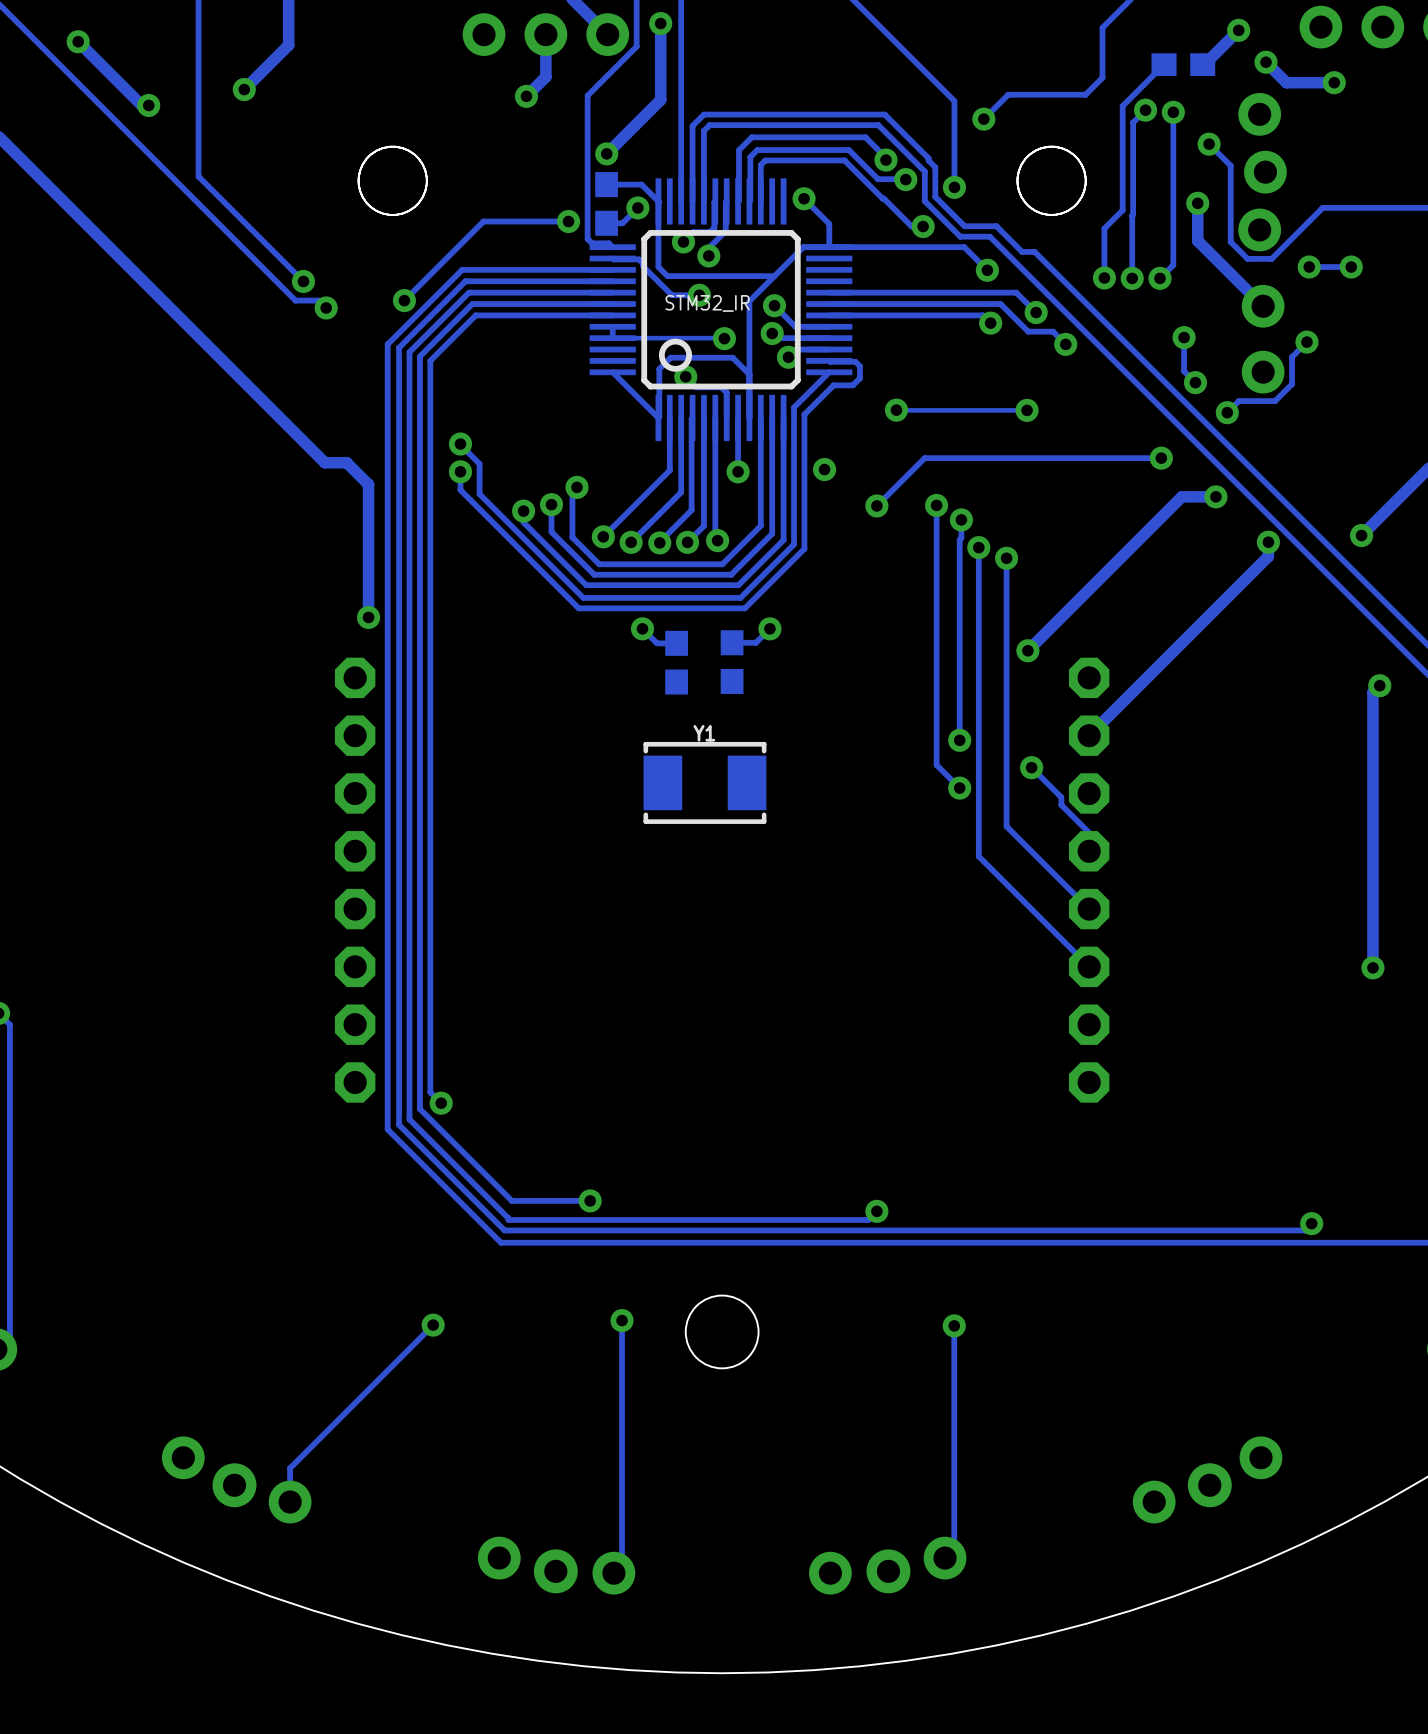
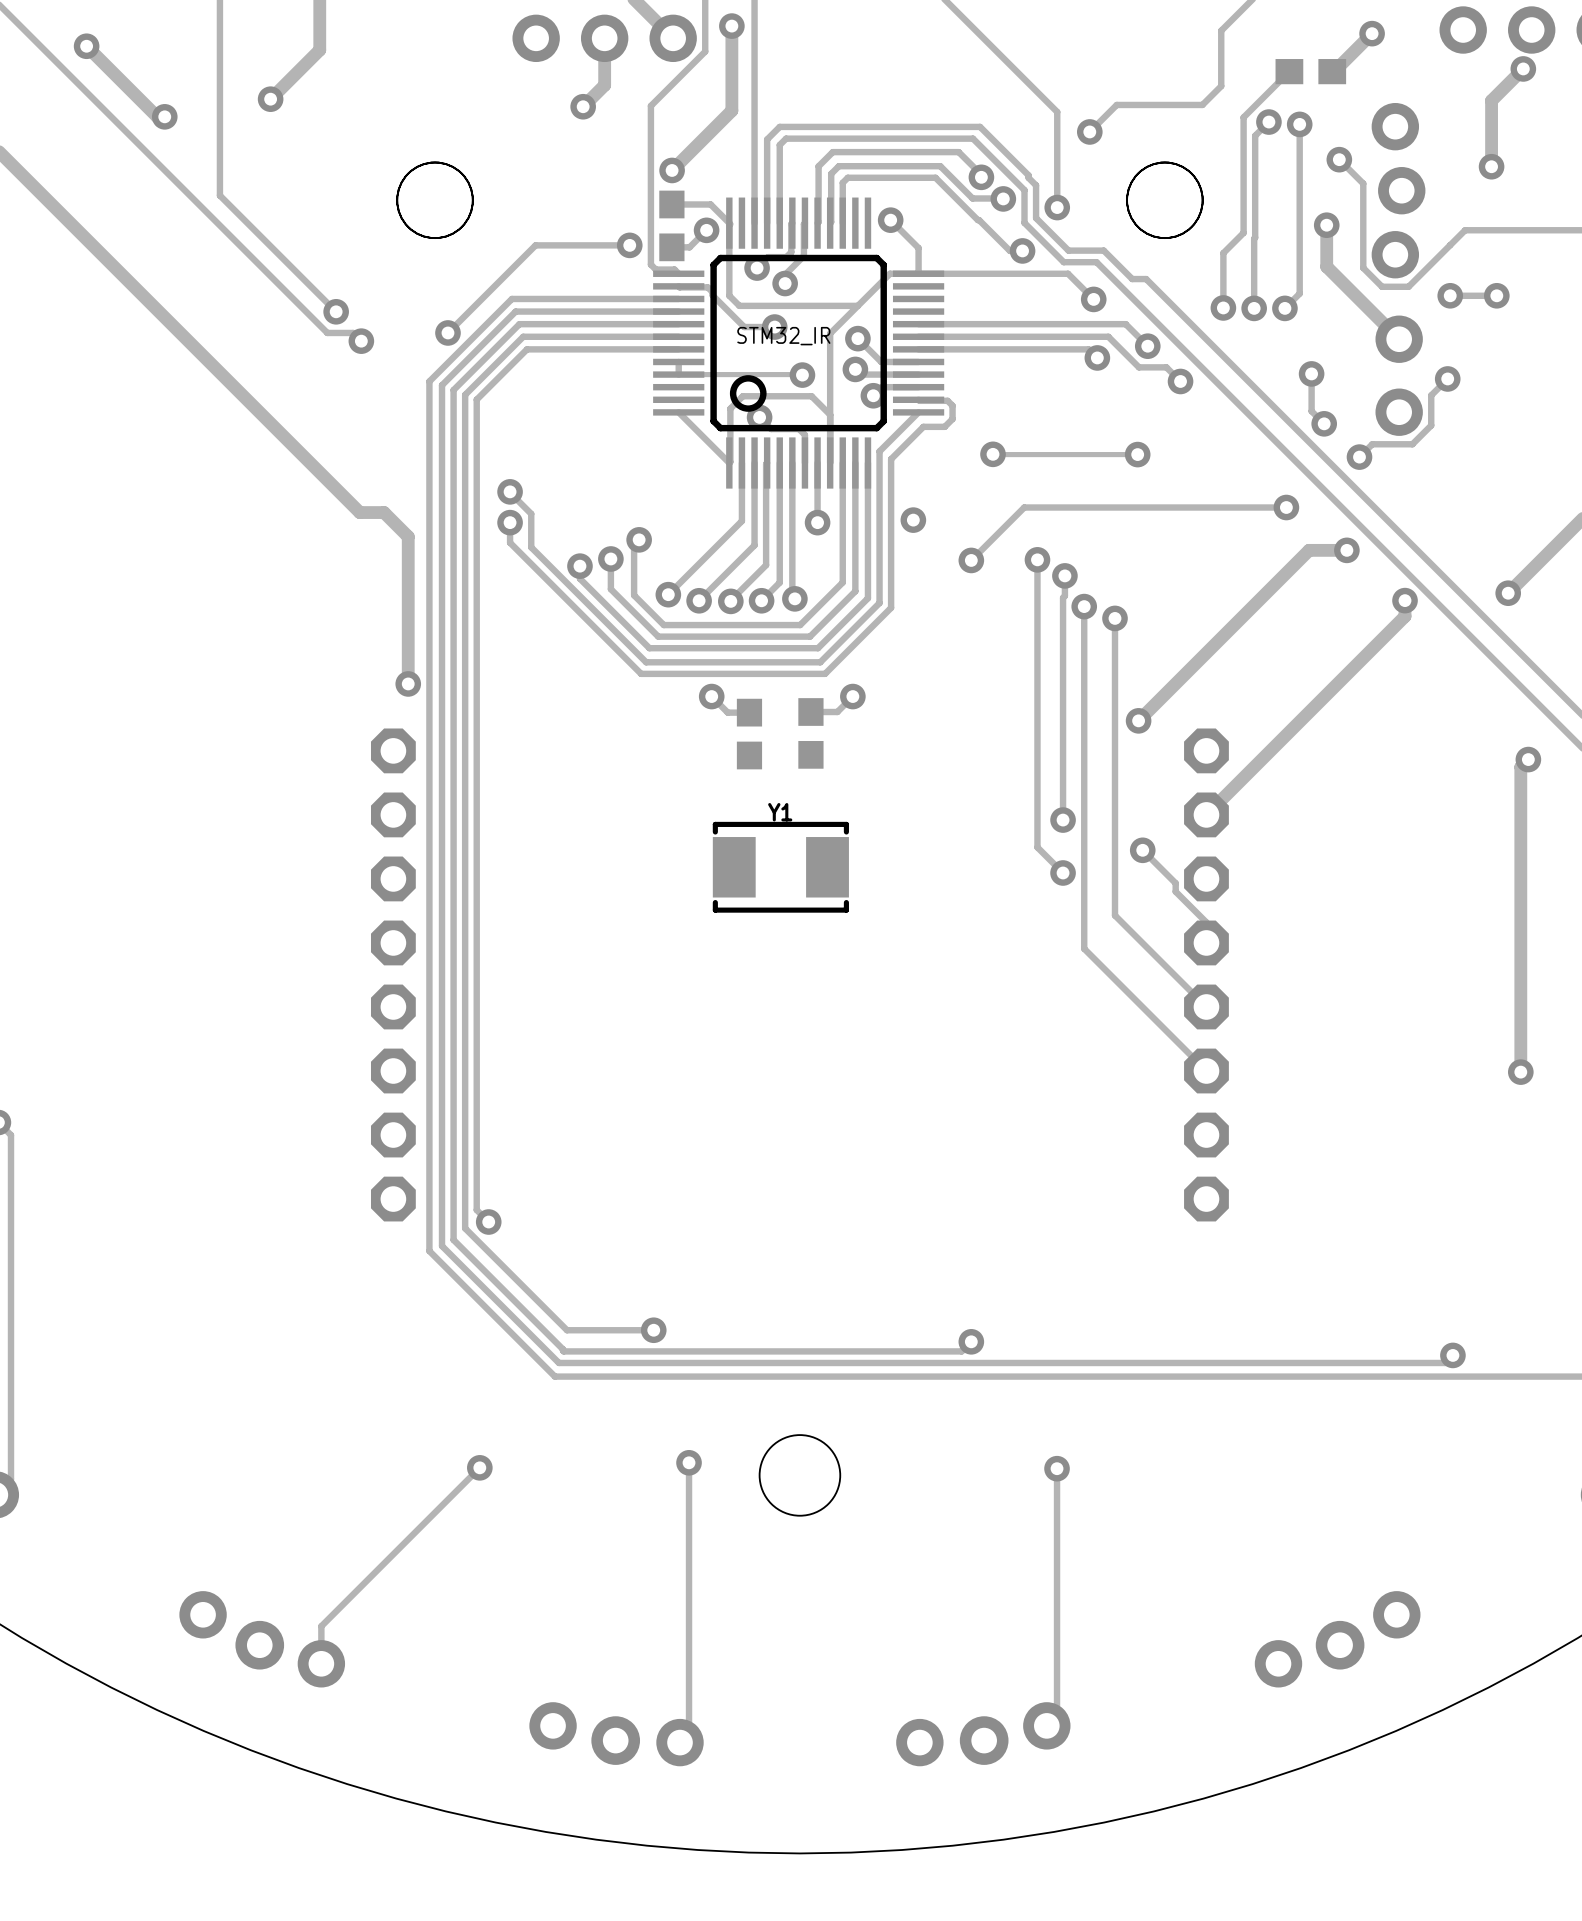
track: (1266, 62) (1286, 82) (1334, 82) -> none
via: (1266, 62) -> none
track: none -> (1523, 68) (1491, 100) (1491, 166)
via: none -> (1523, 68)
via: (1334, 82) -> none
via: none -> (1491, 166)

